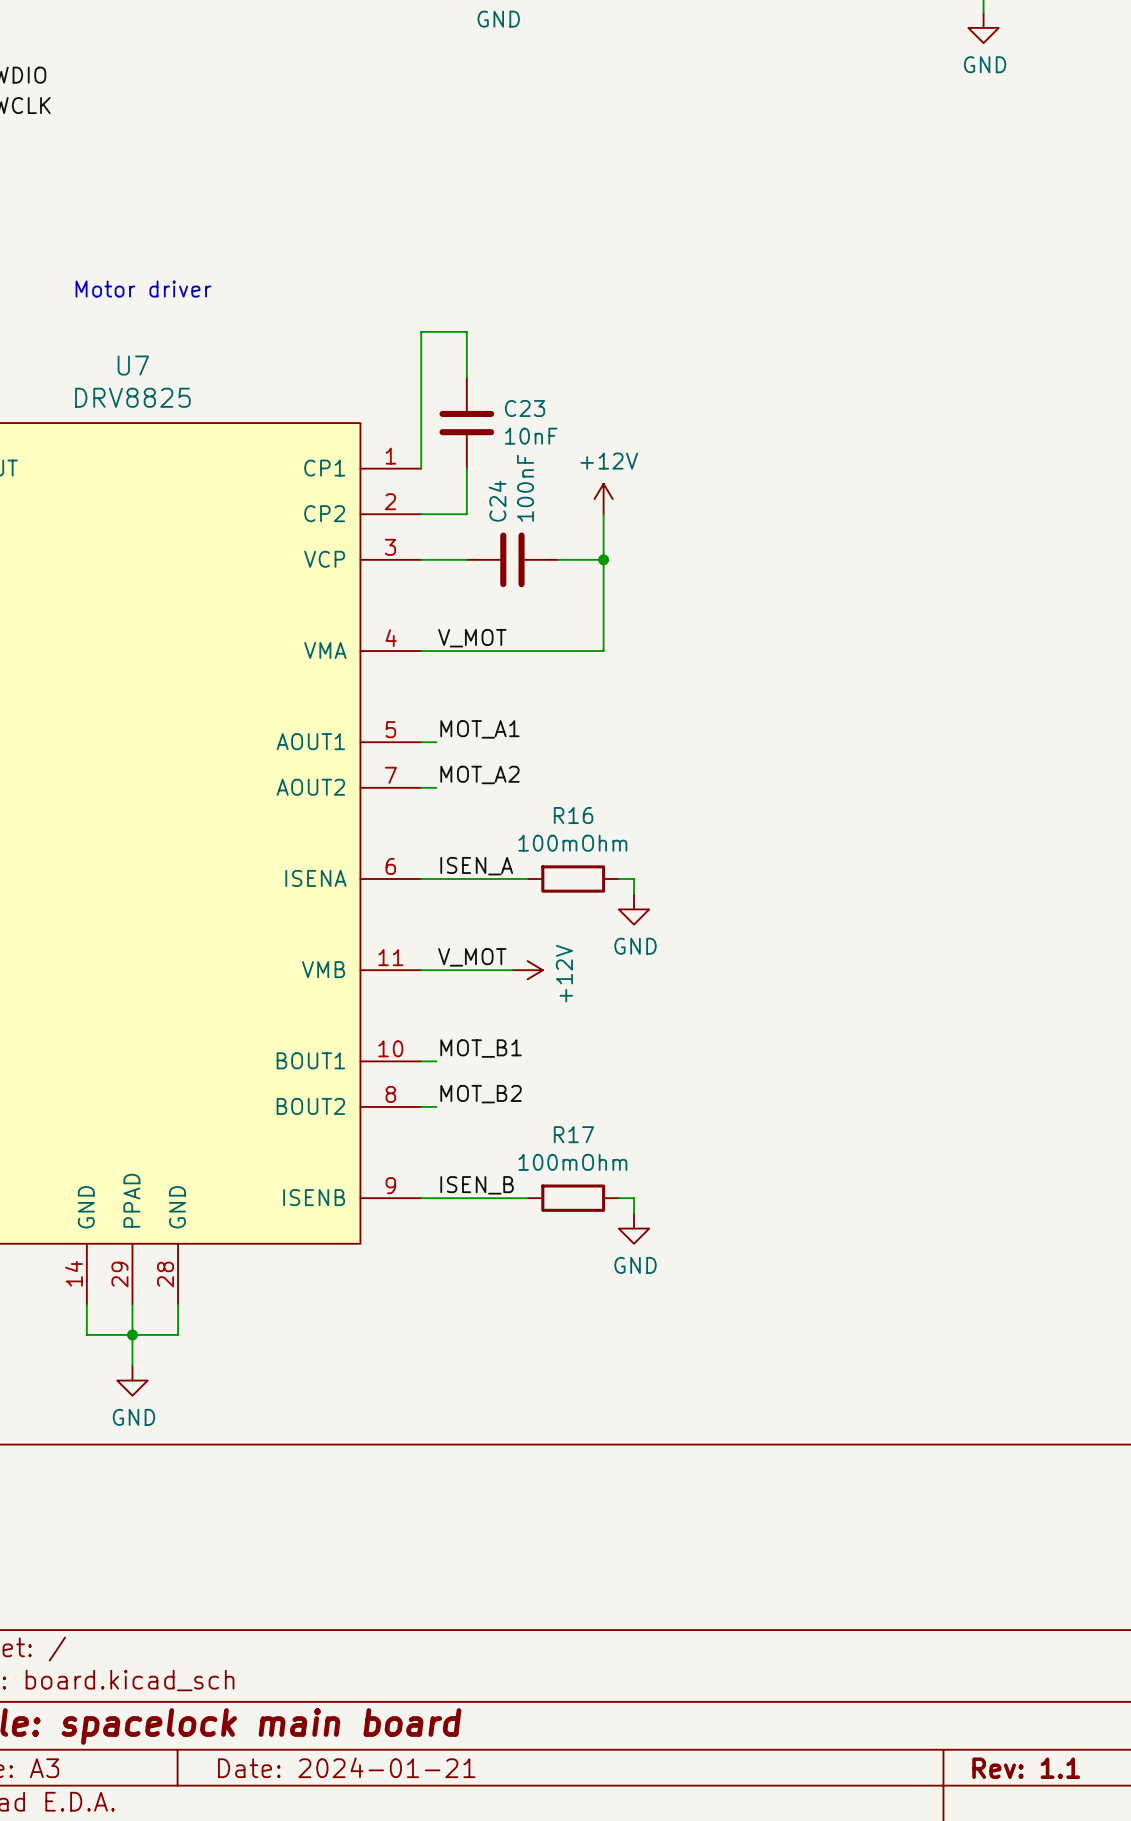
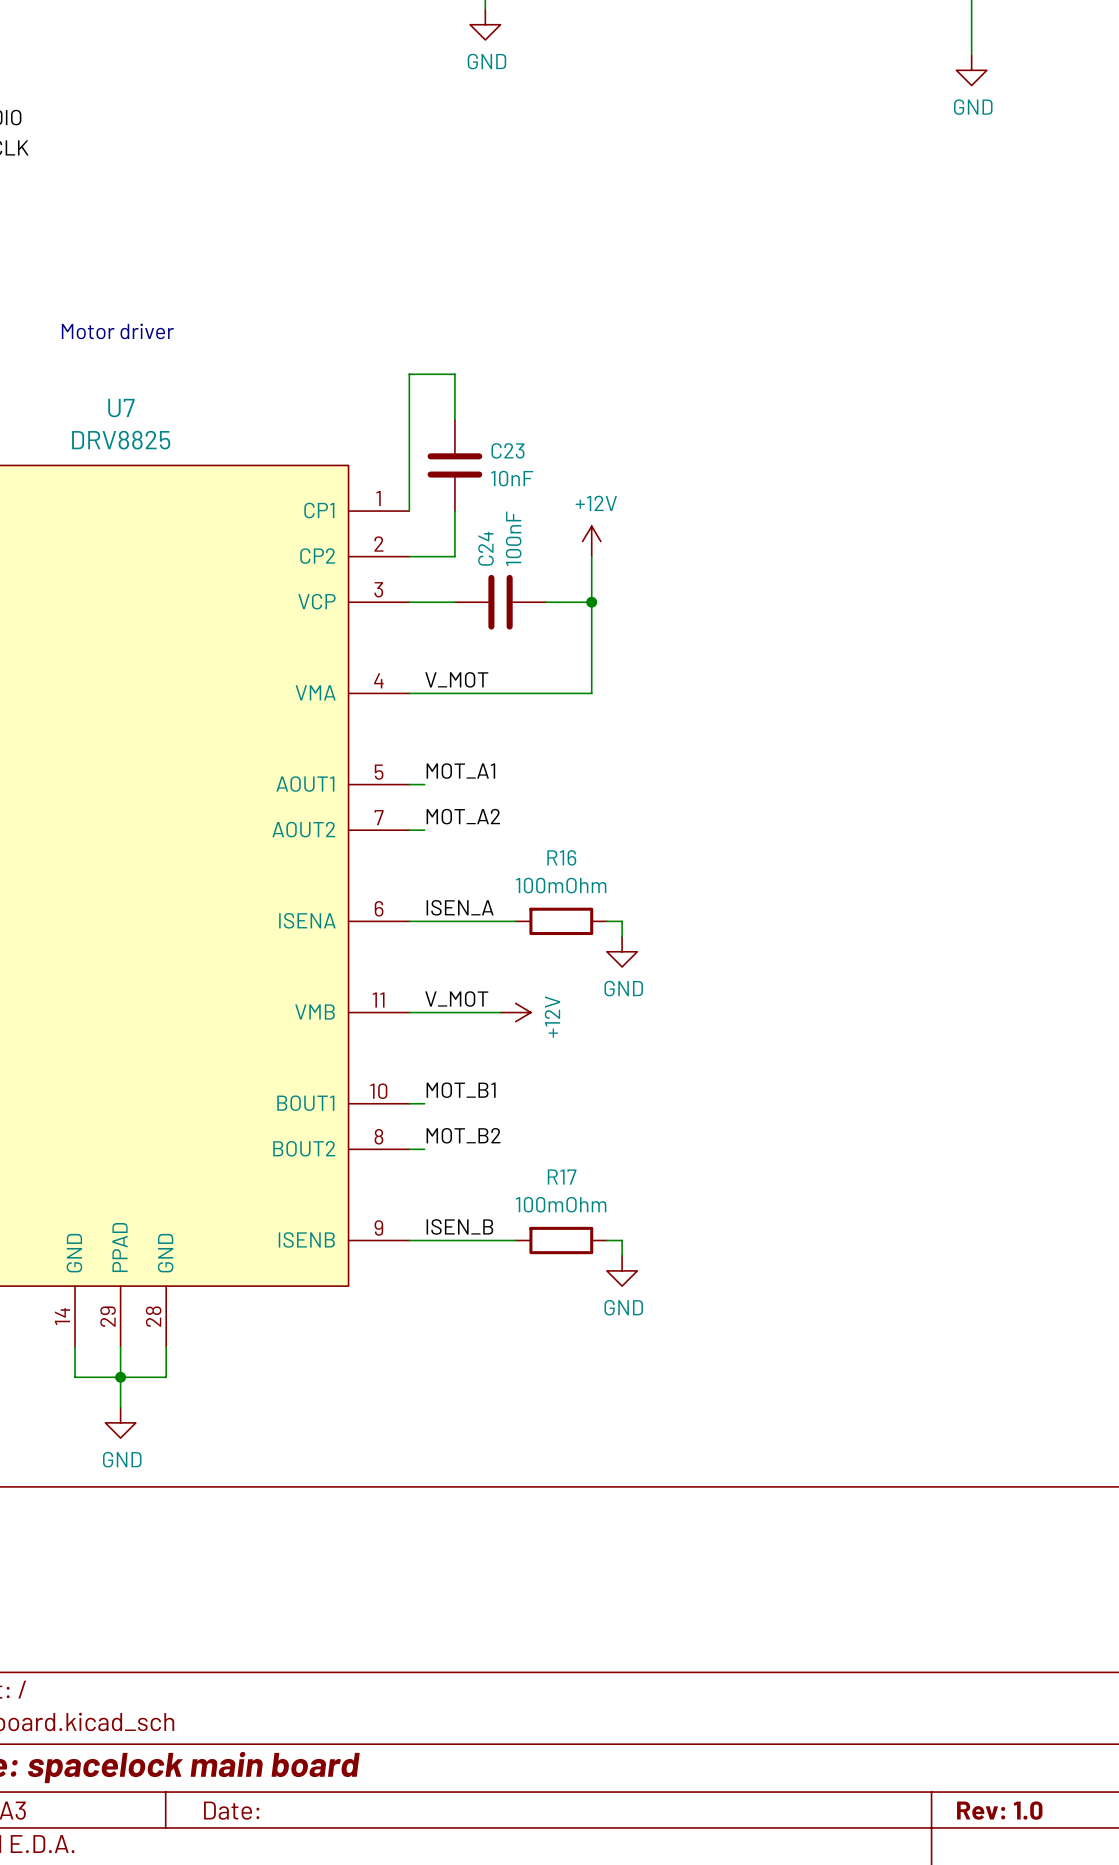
title block: Date: 2024-01-21 (346, 1767) -> Date: (231, 1810)
title block: Rev: 1.1 (1026, 1768) -> Rev: 1.0 (999, 1810)

